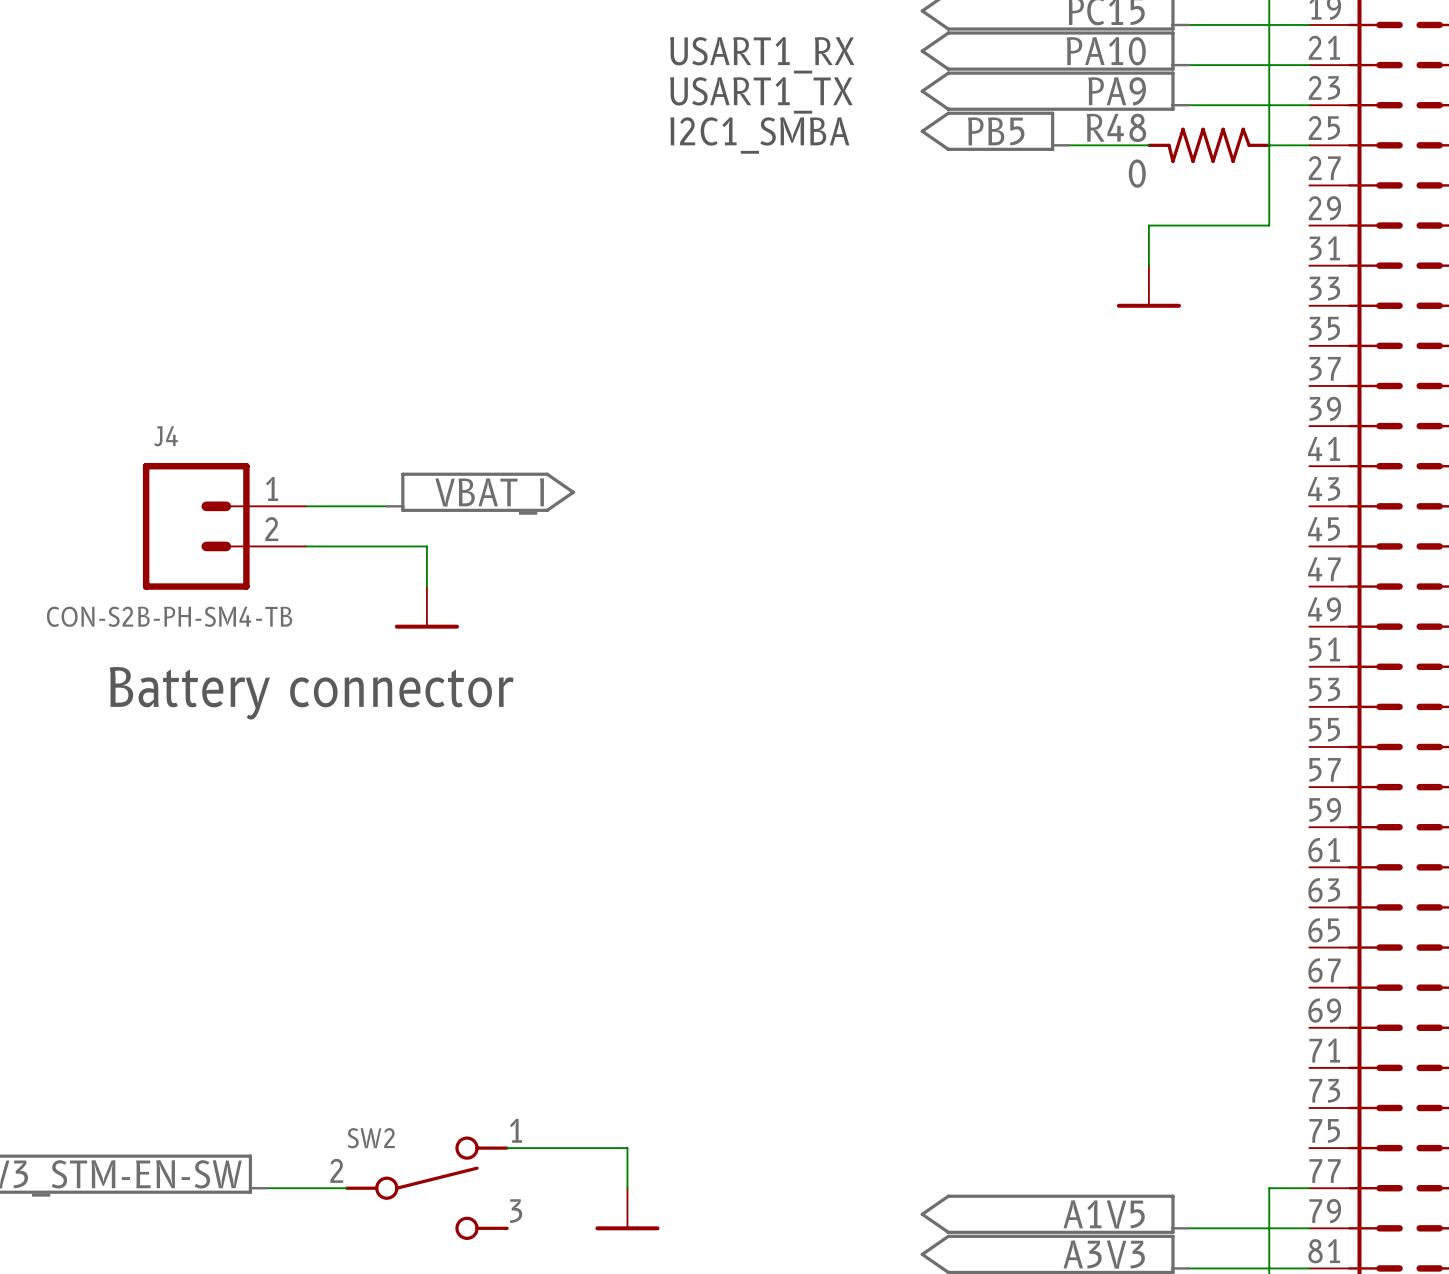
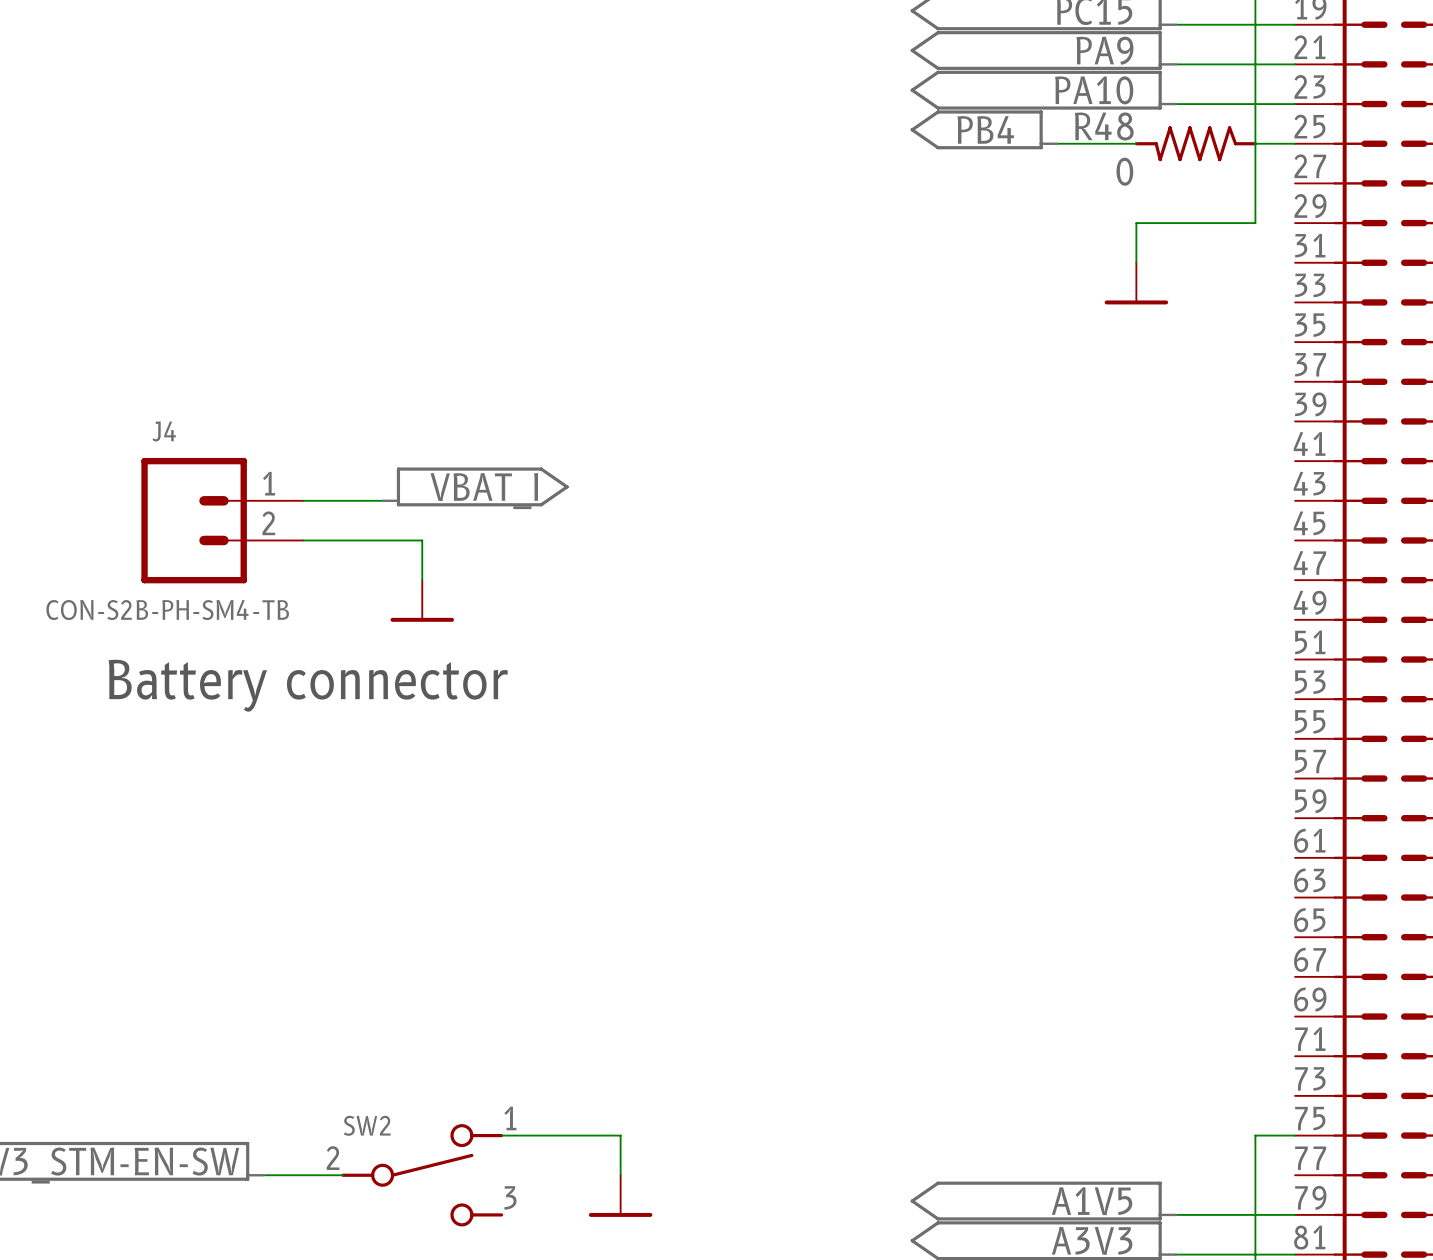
label: PA10 (1106, 51) -> PA9 (1104, 50)
text: USART1_RX (762, 55) -> none
label: PA9 (1117, 91) -> PA10 (1094, 90)
text: USART1_TX (761, 95) -> none
label: PB5 (996, 131) -> PB4 (985, 129)
text: I2C1_SMBA (759, 135) -> none
wire: (1269, 1188) (1309, 1188) -> (1255, 1175) (1255, 1135) (1295, 1135)

